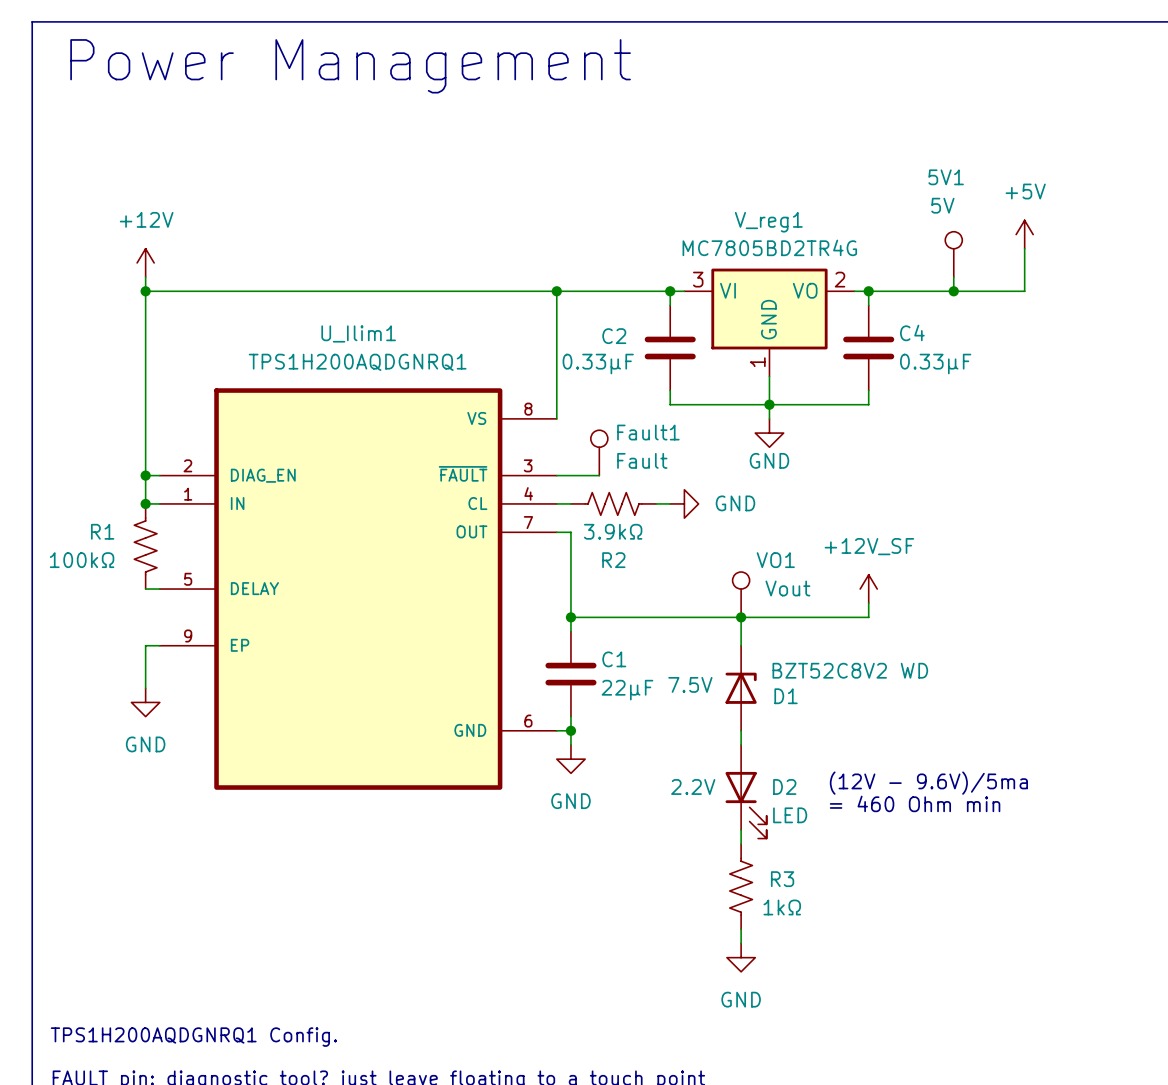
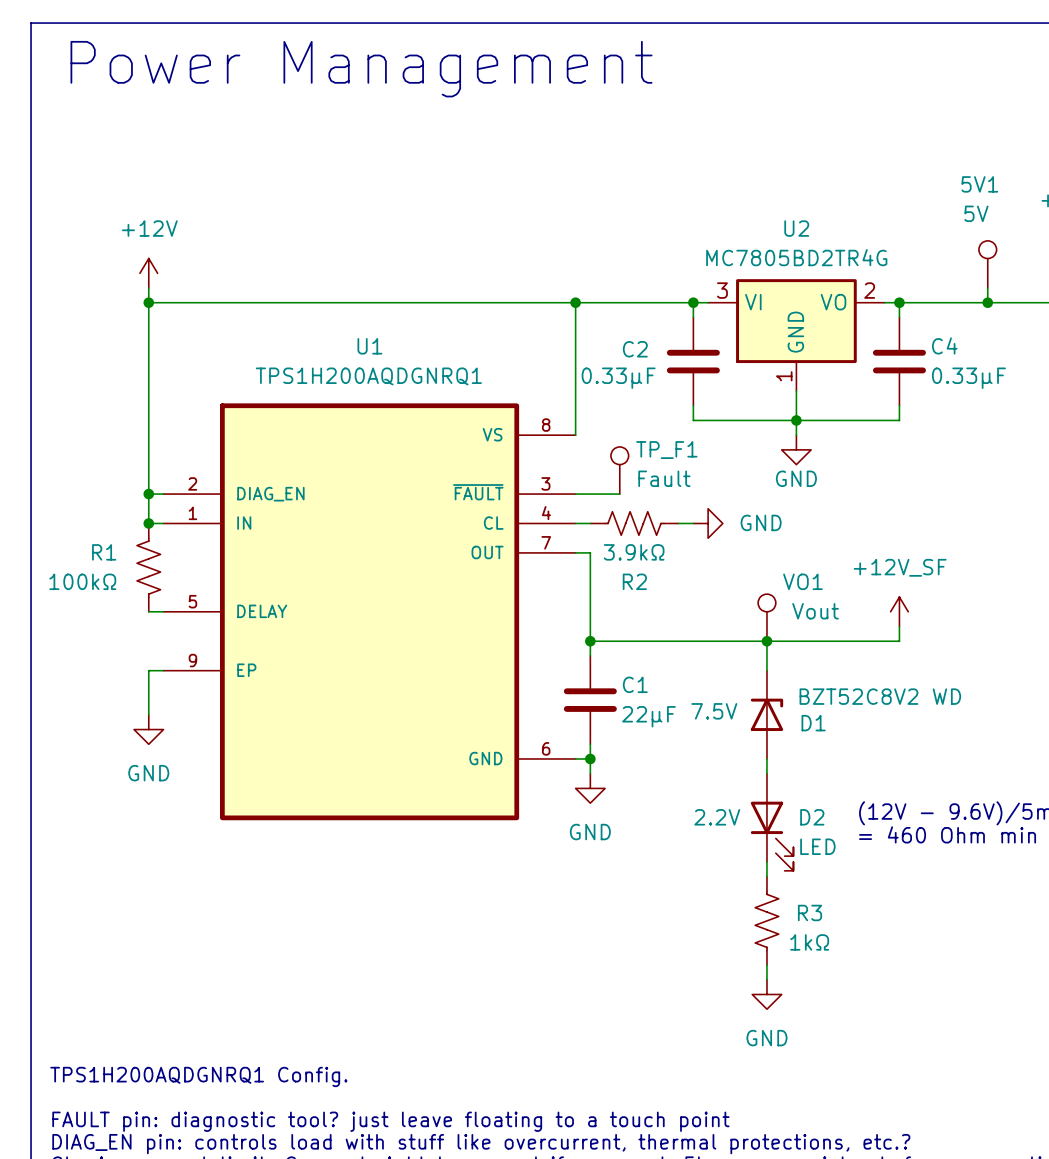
V_reg1 name: V_reg1 (768, 222) -> U2 (796, 228)
U_Ilim1 name: U_Ilim1 (358, 333) -> U1 (369, 346)
Fault1 name: Fault1 (648, 432) -> TP_F1 (666, 450)

